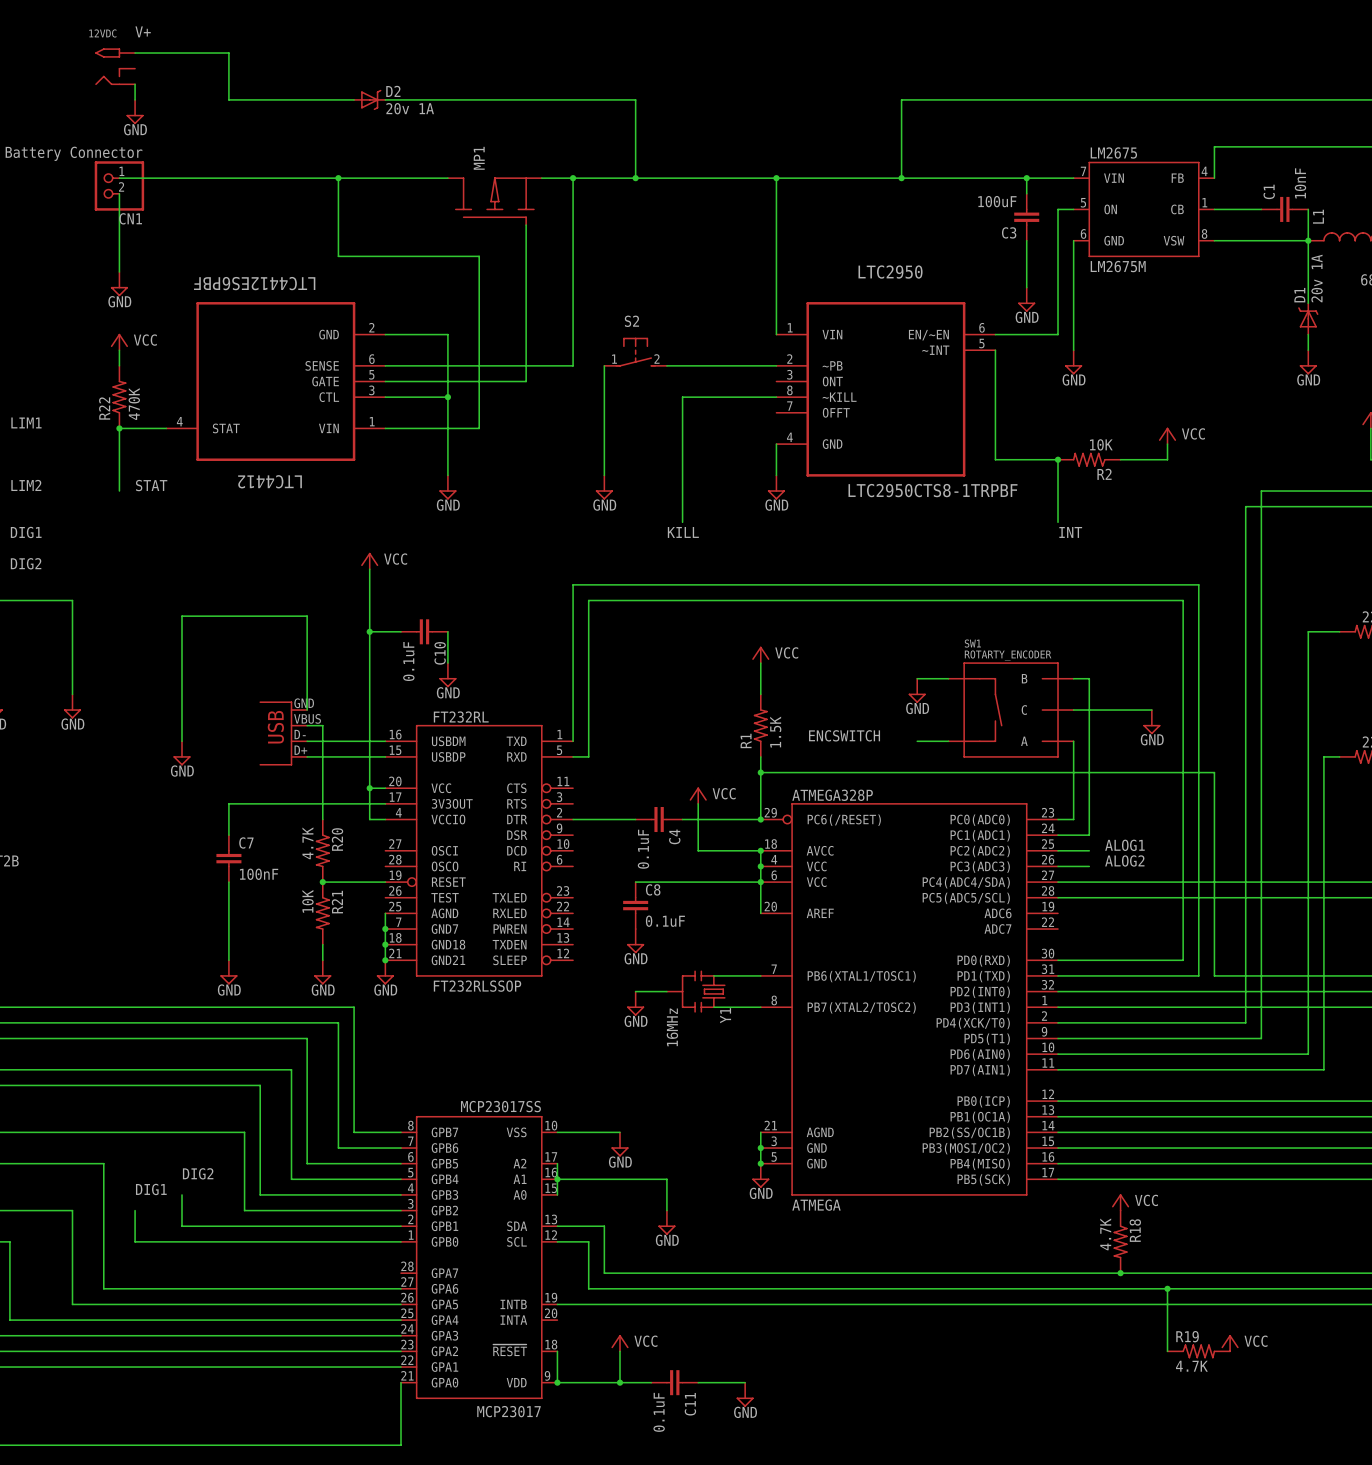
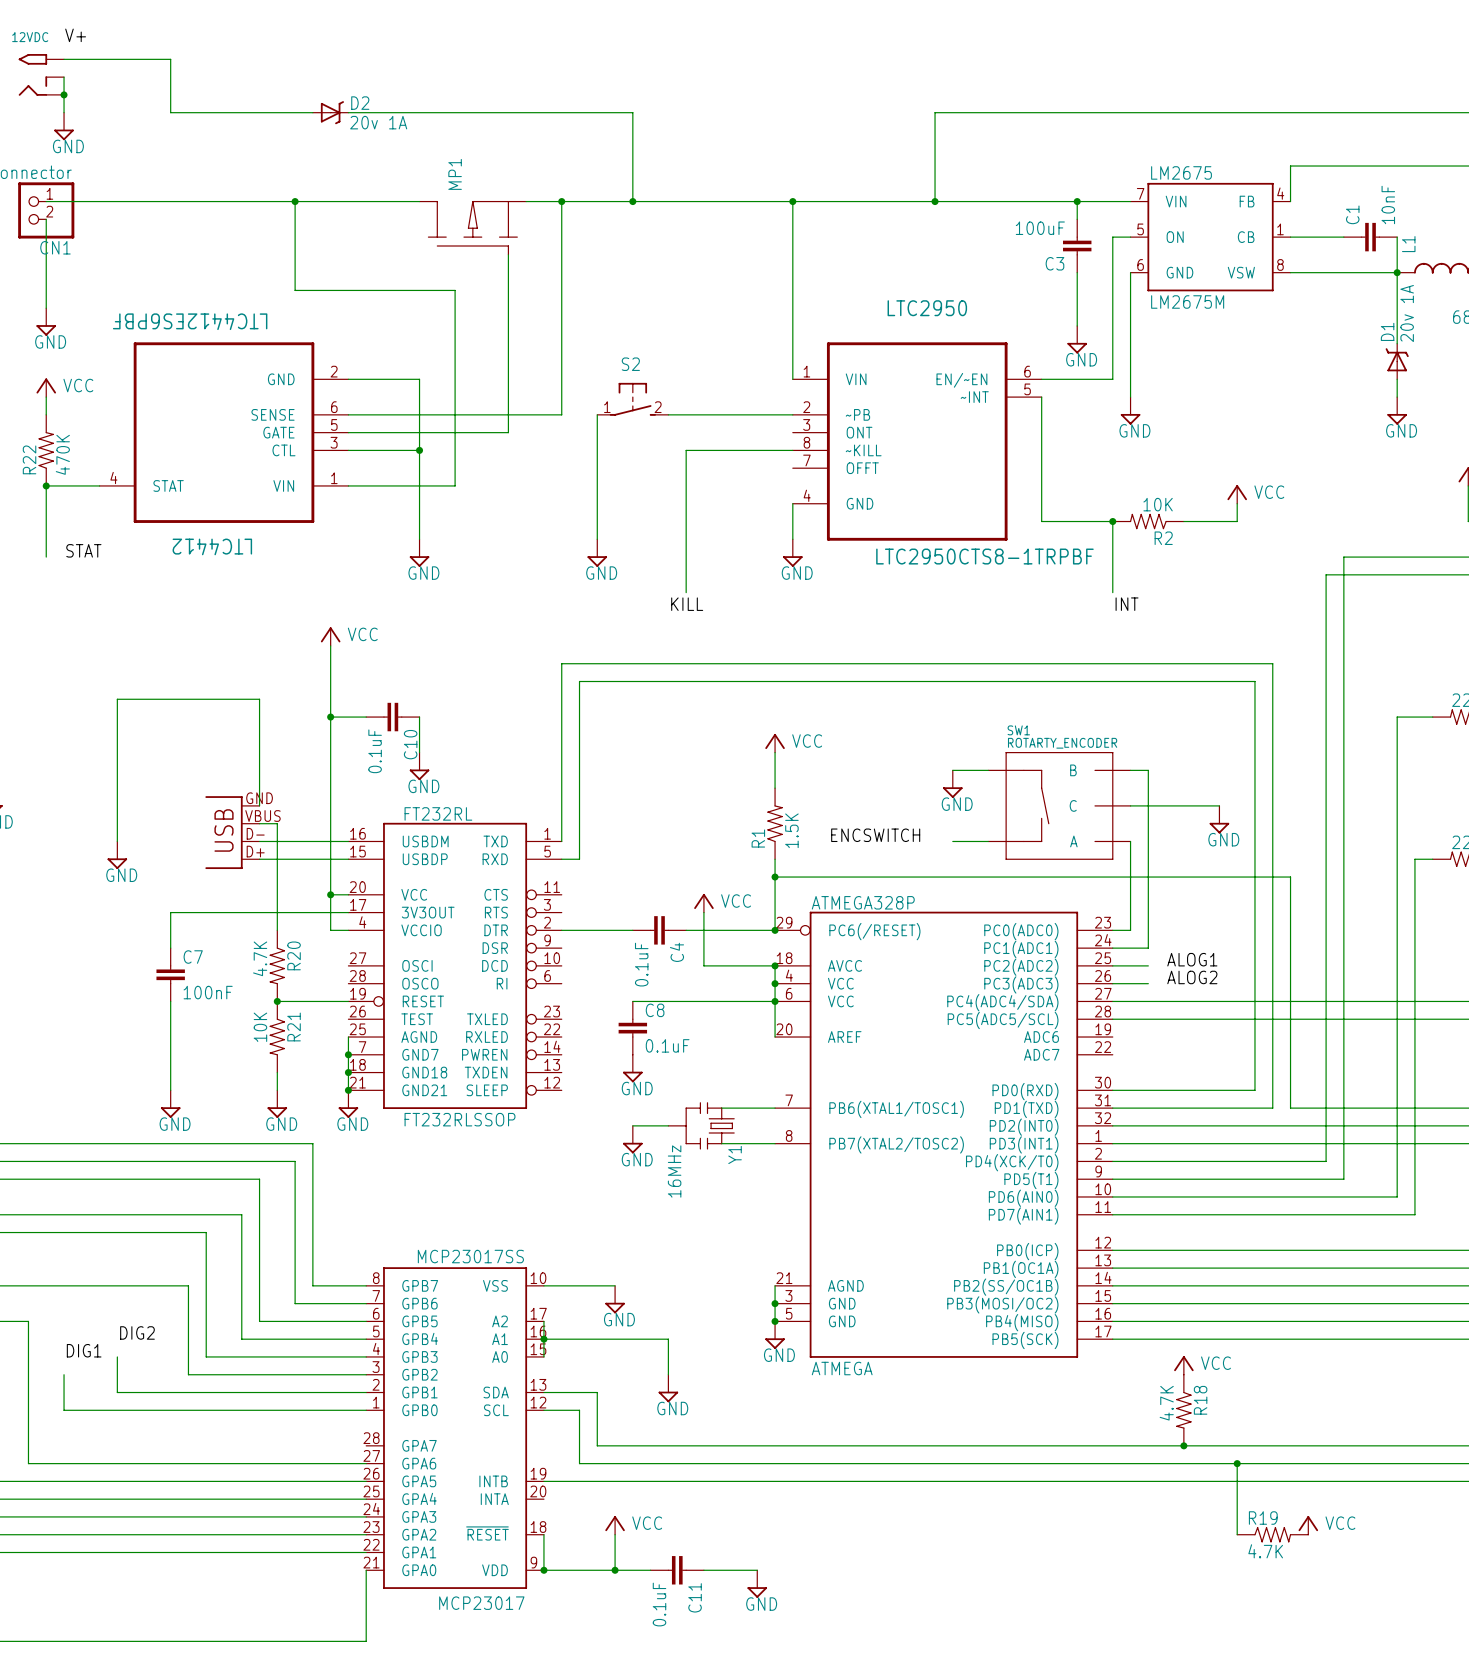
wire: none -> (64, 77) (64, 94)
junction: none -> (64, 94)

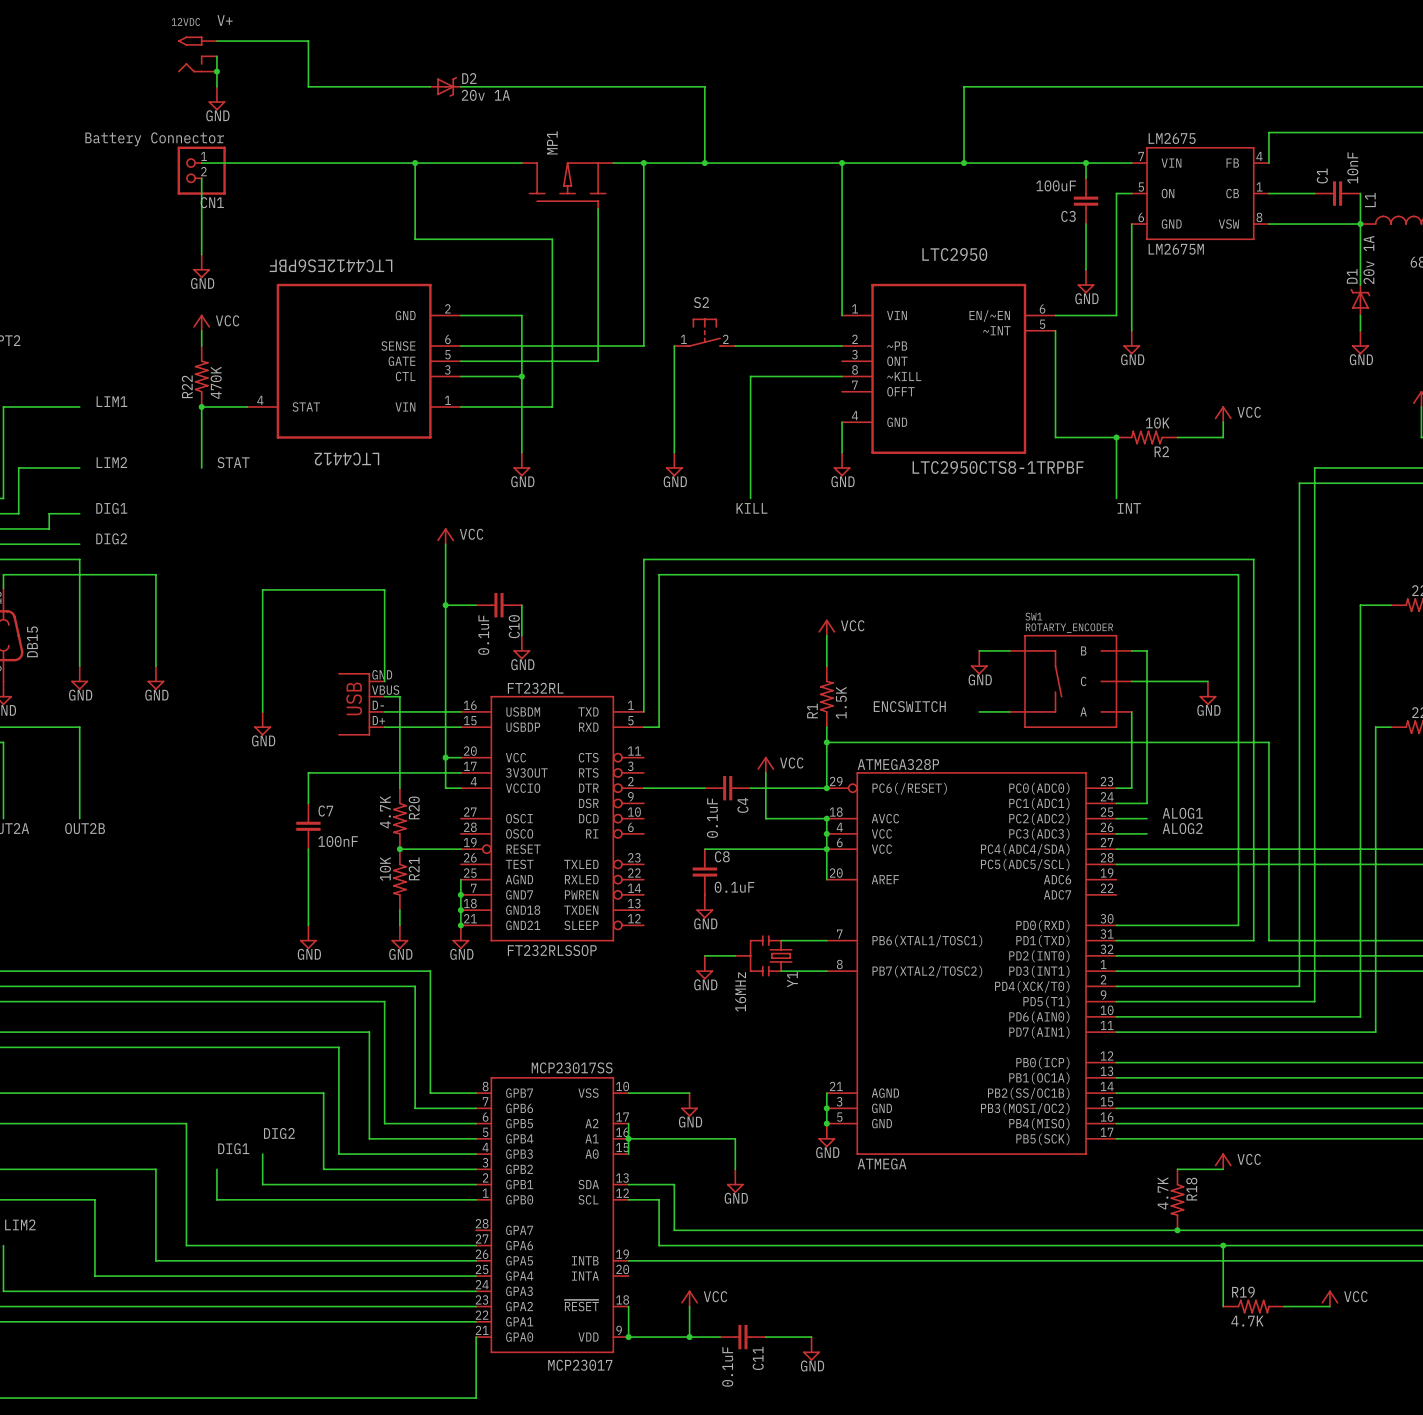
power symbol position: VCC (1183, 1365) -> VCC (1223, 1161)
wire: none -> (1177, 1169) (1223, 1169)
power symbol position: VCC (1308, 1525) -> VCC (1329, 1298)
wire: none -> (1284, 1306) (1329, 1306)

